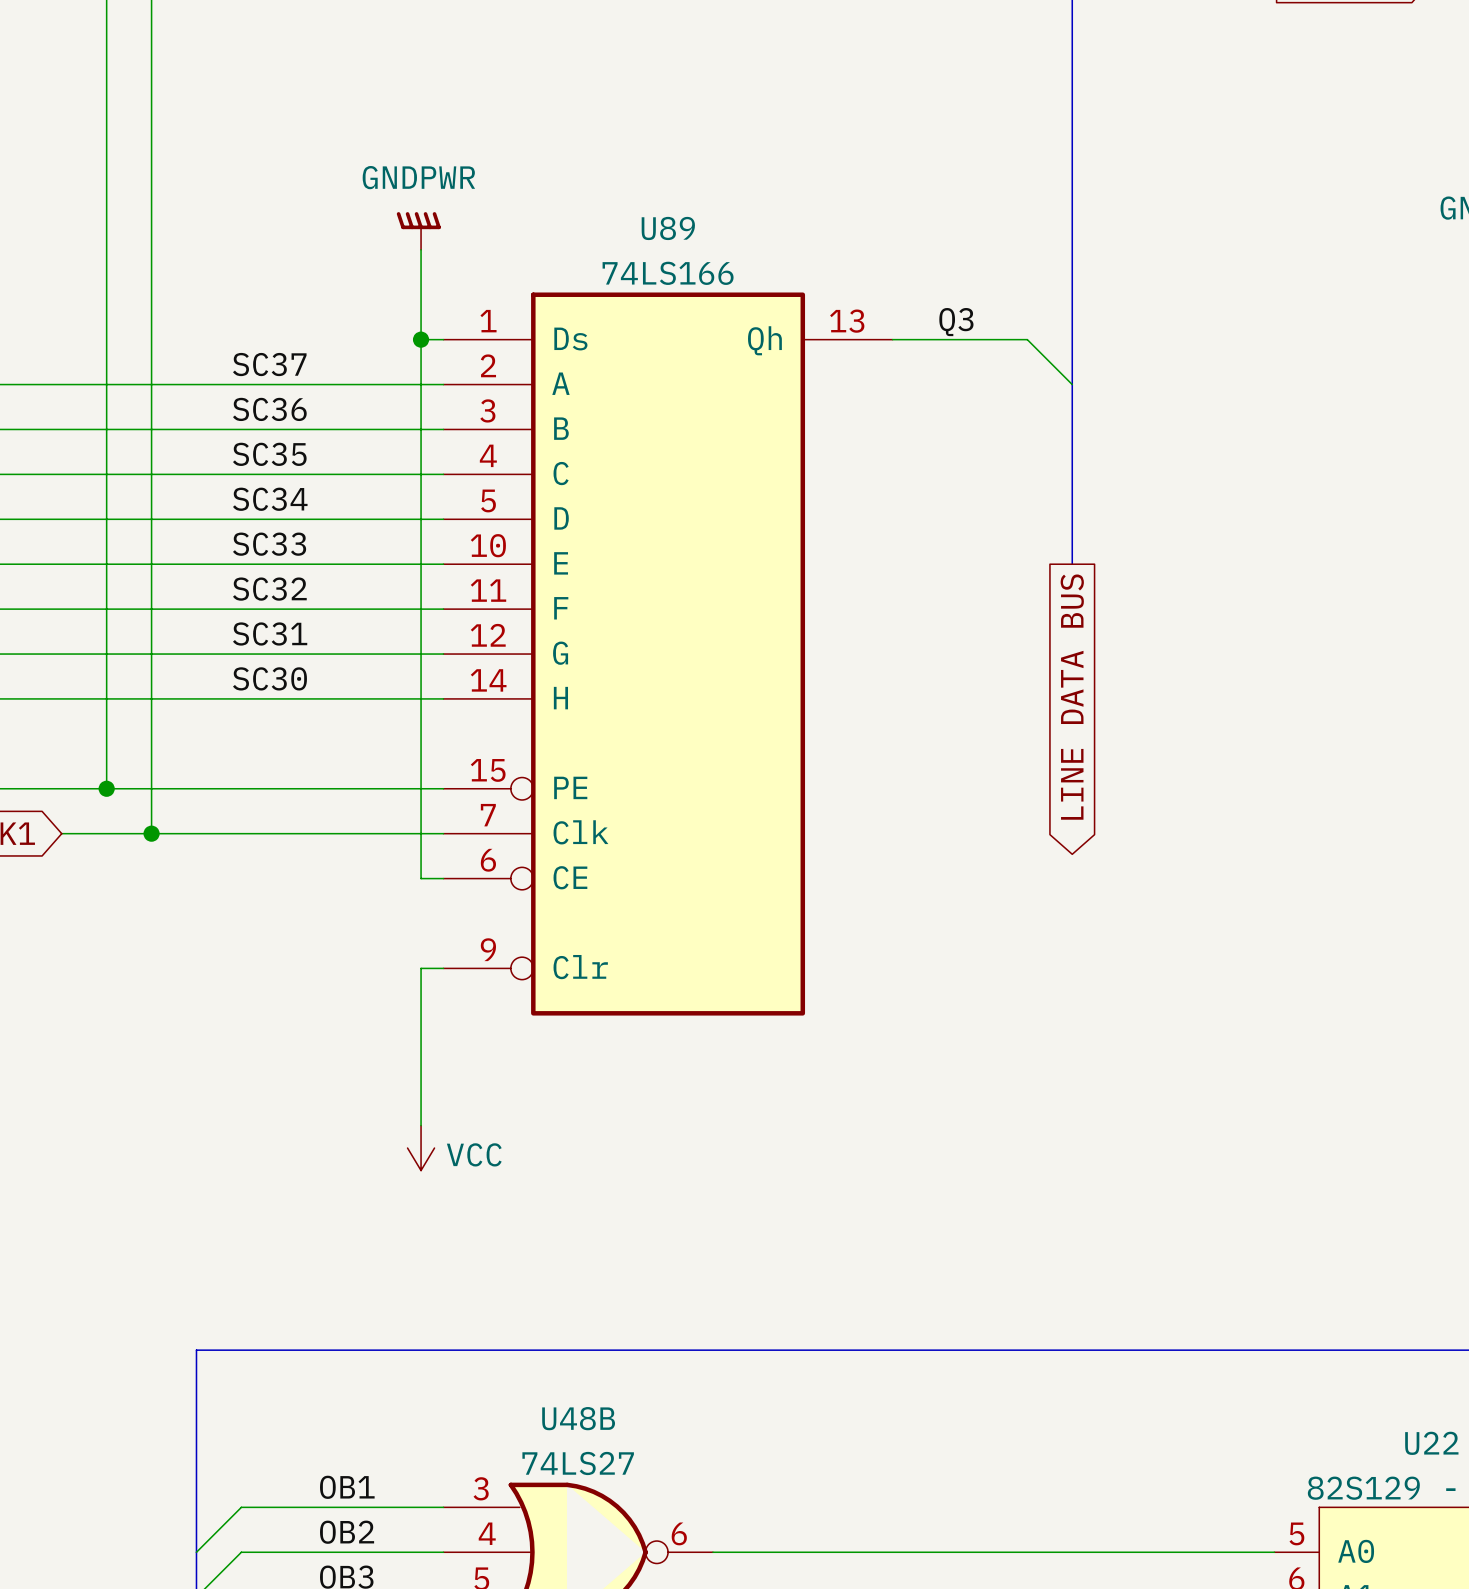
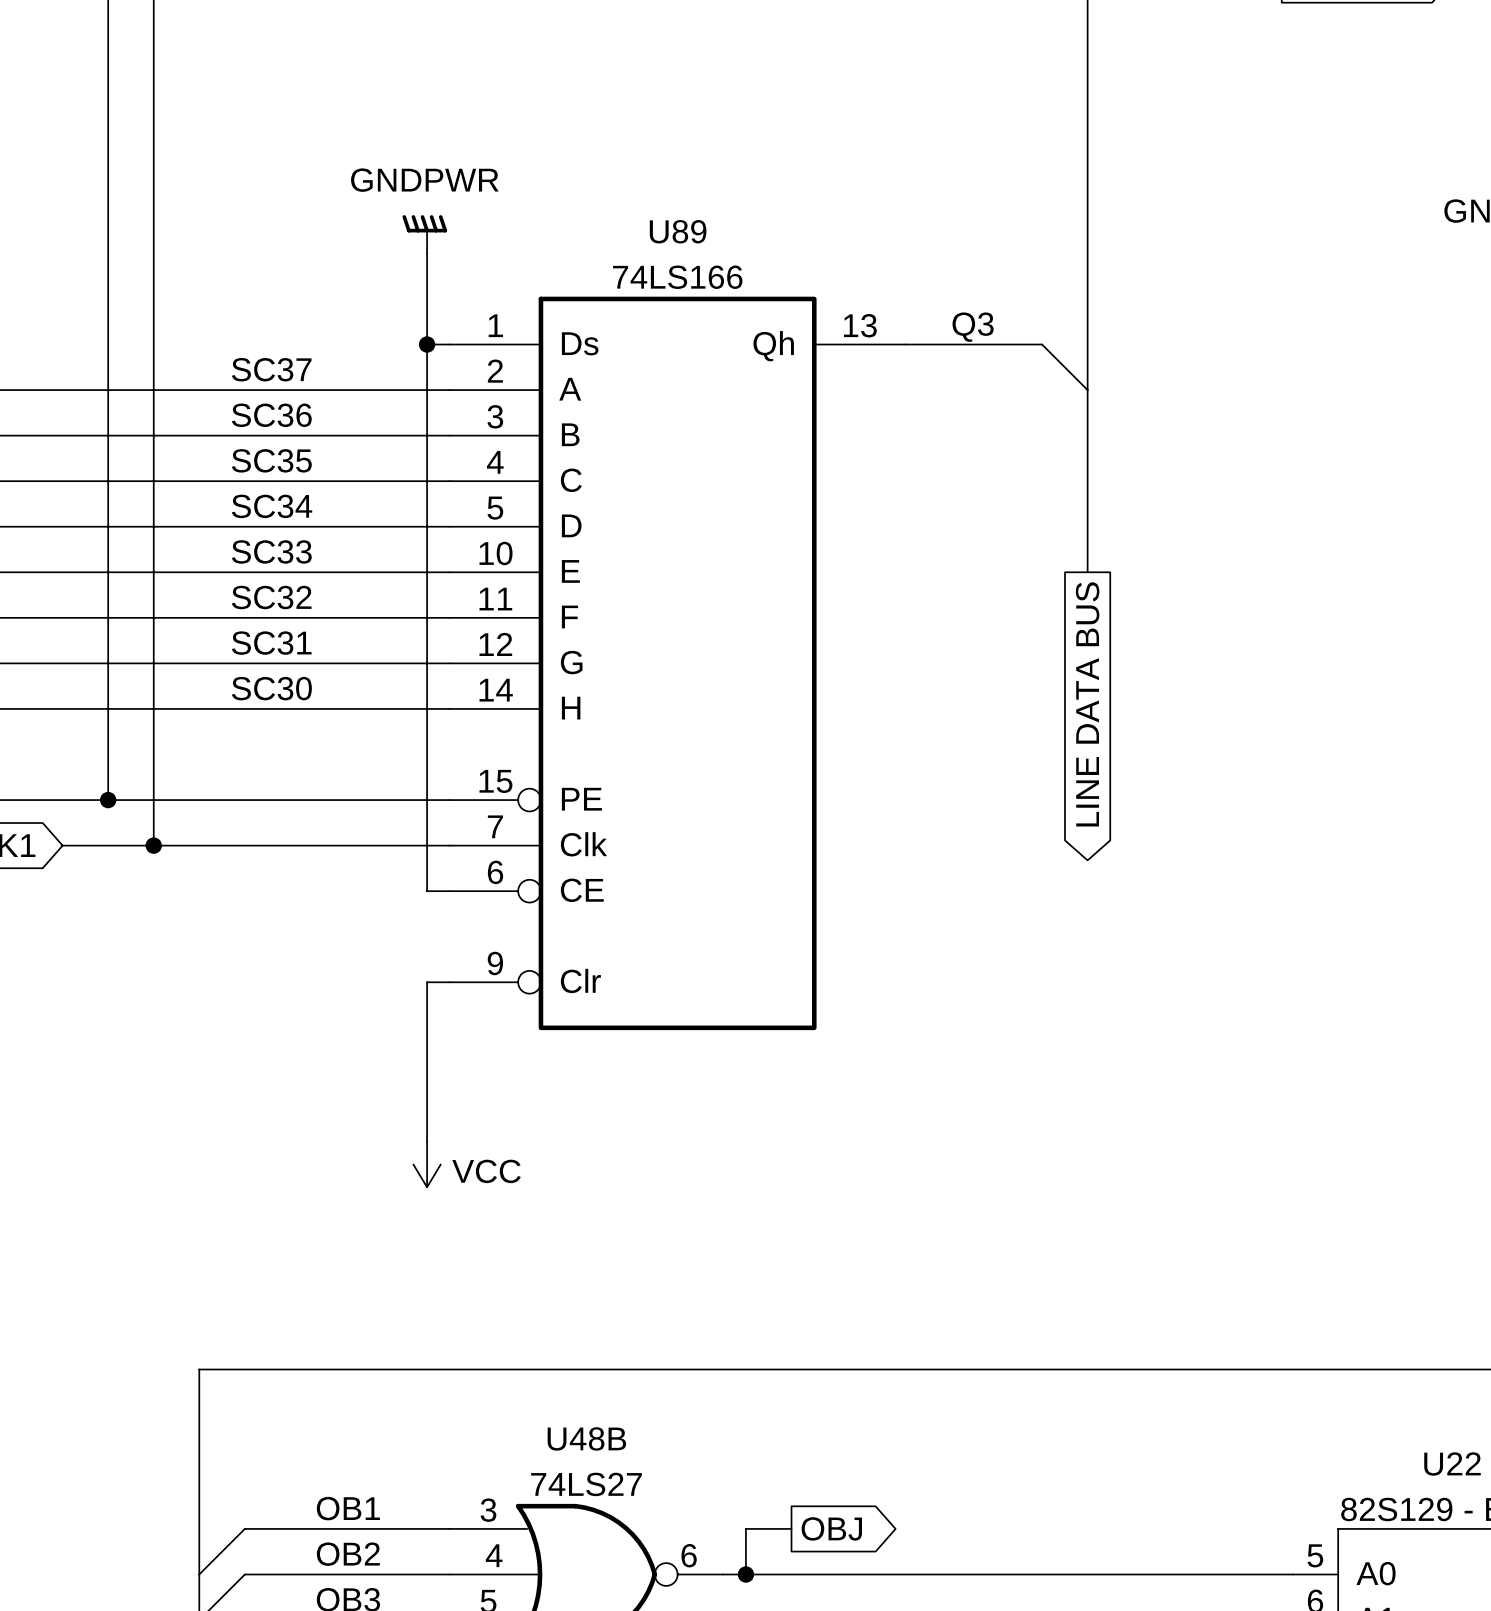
wire: none -> (791, 1528) (745, 1528) (745, 1574)
global label: none -> OBJ (831, 1528)
junction: none -> (745, 1574)

